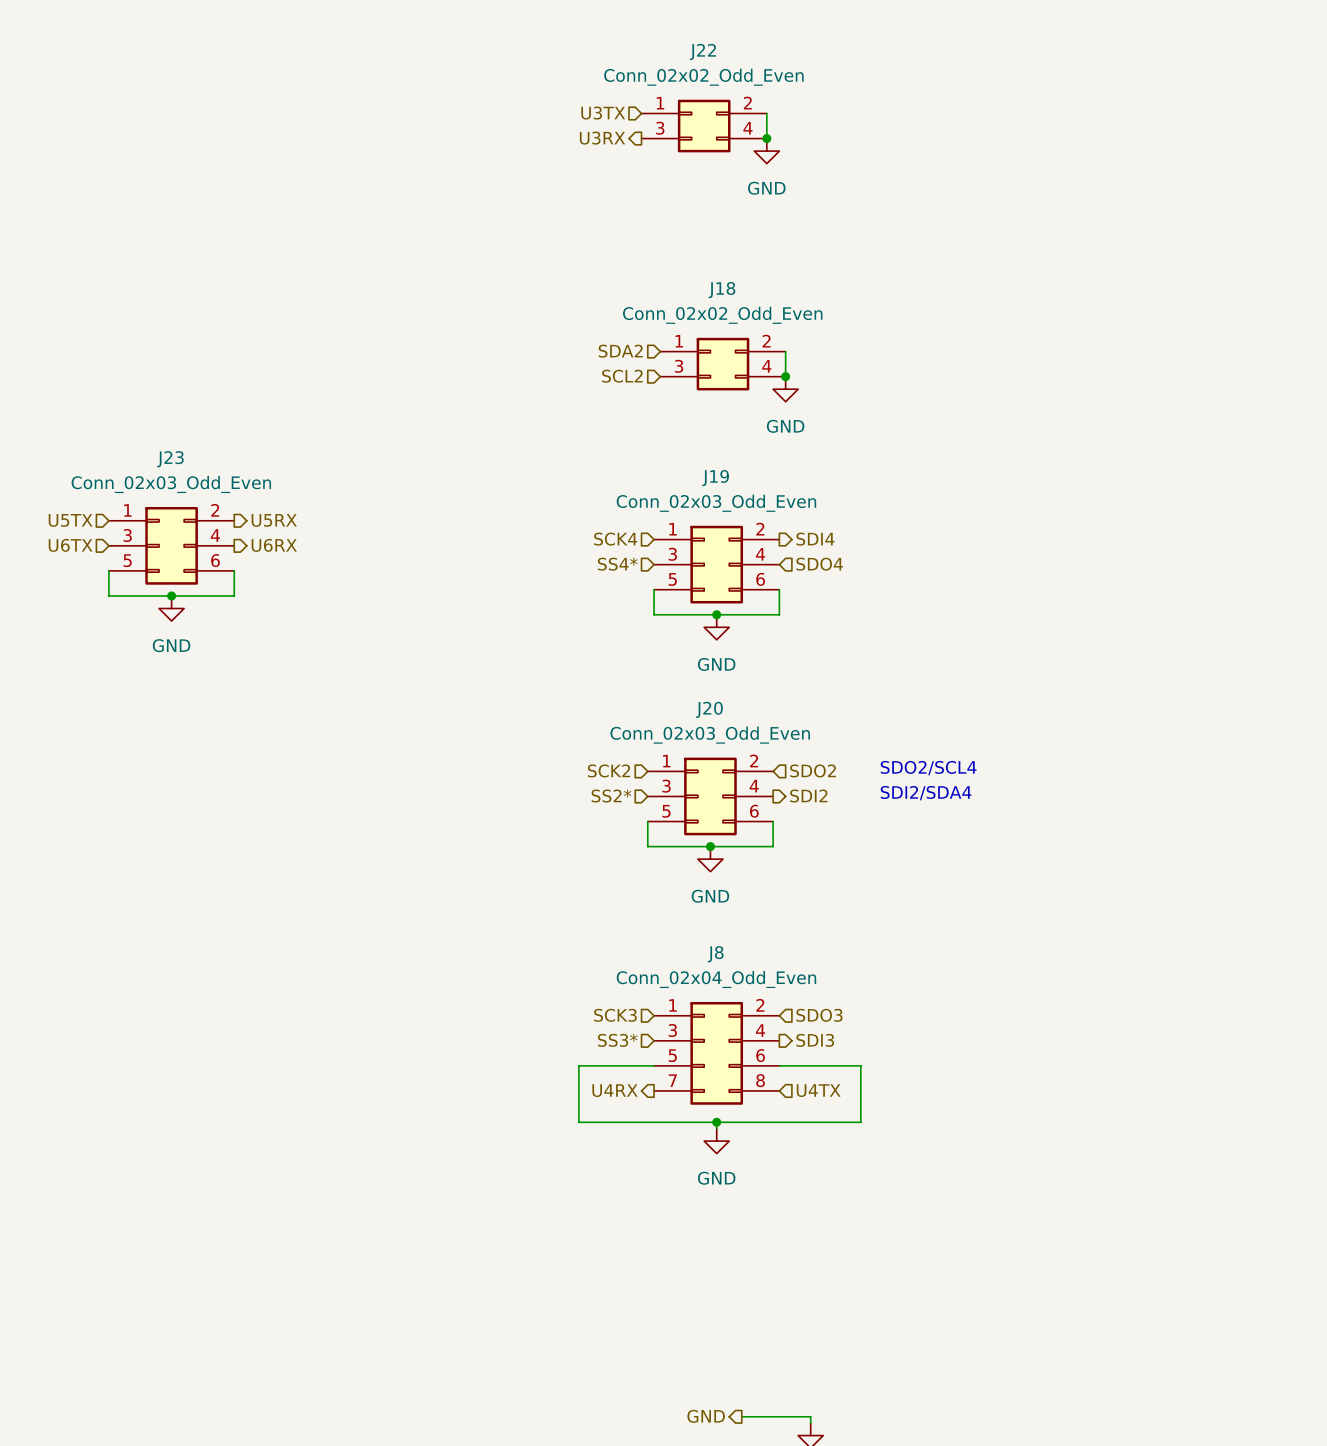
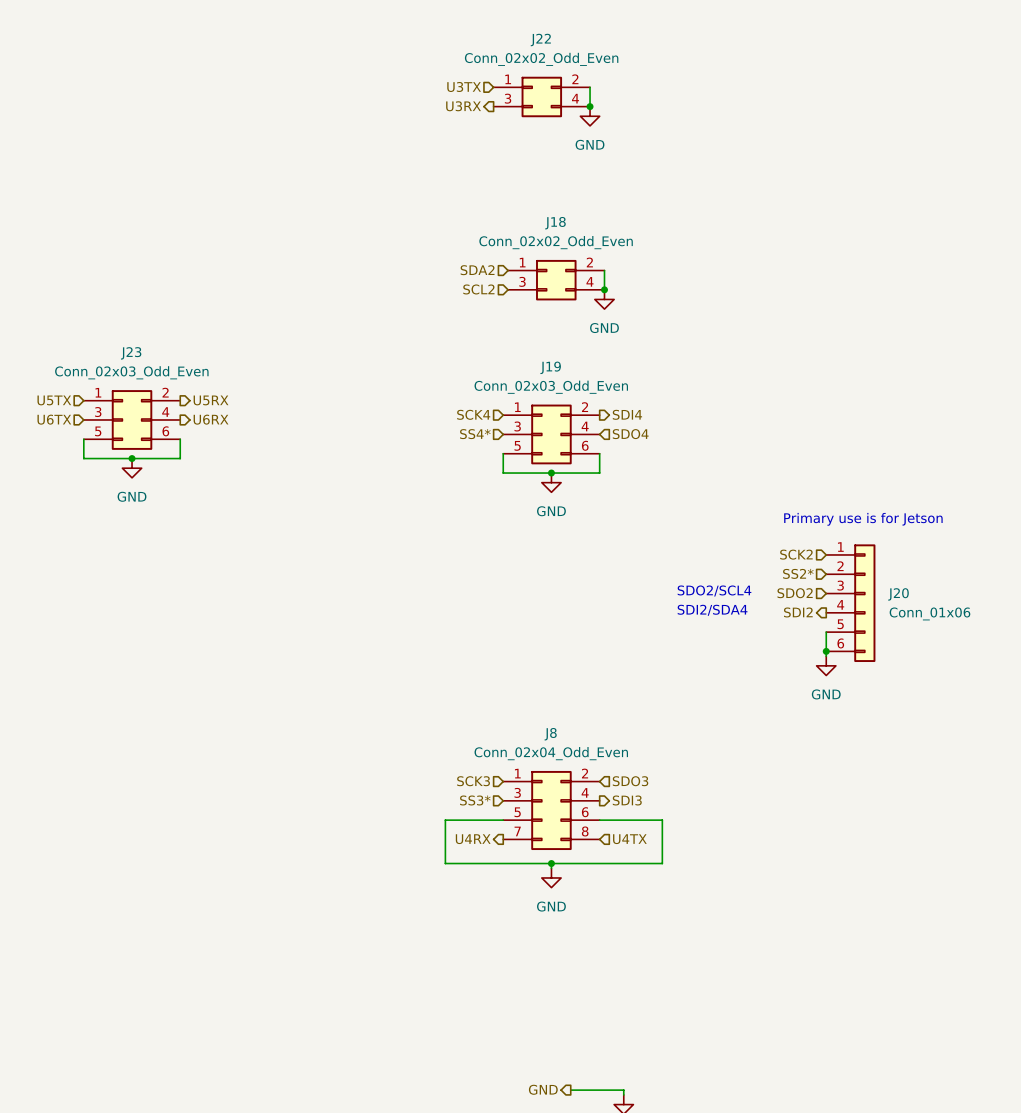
text: none -> Primary use is for Jetson (863, 519)
J20 name position: J20 (709, 709) -> J20 (898, 594)
hierarchical label: none -> SCK2 (796, 554)
J20 value: Conn_02x03_Odd_Even (710, 735) -> Conn_01x06 (929, 613)
hierarchical label: none -> SS2* (798, 573)
J20 symbol: [647, 757, 774, 836] -> [826, 544, 876, 663]
hierarchical label: SCK2 (609, 770) -> none
hierarchical label: SDO2 (813, 770) -> none
hierarchical label: none -> SDO2 (795, 593)
hierarchical label: SS2* (611, 796) -> none
hierarchical label: SDI2 (808, 796) -> none
hierarchical label: none -> SDI2 (798, 612)
wire: (647, 821) (647, 846) (773, 846) (773, 821) -> none
wire: none -> (826, 632) (826, 656)
junction: (710, 846) -> none
junction: none -> (826, 651)
power symbol: GND (710, 859) -> none
power symbol: none -> GND (826, 665)

